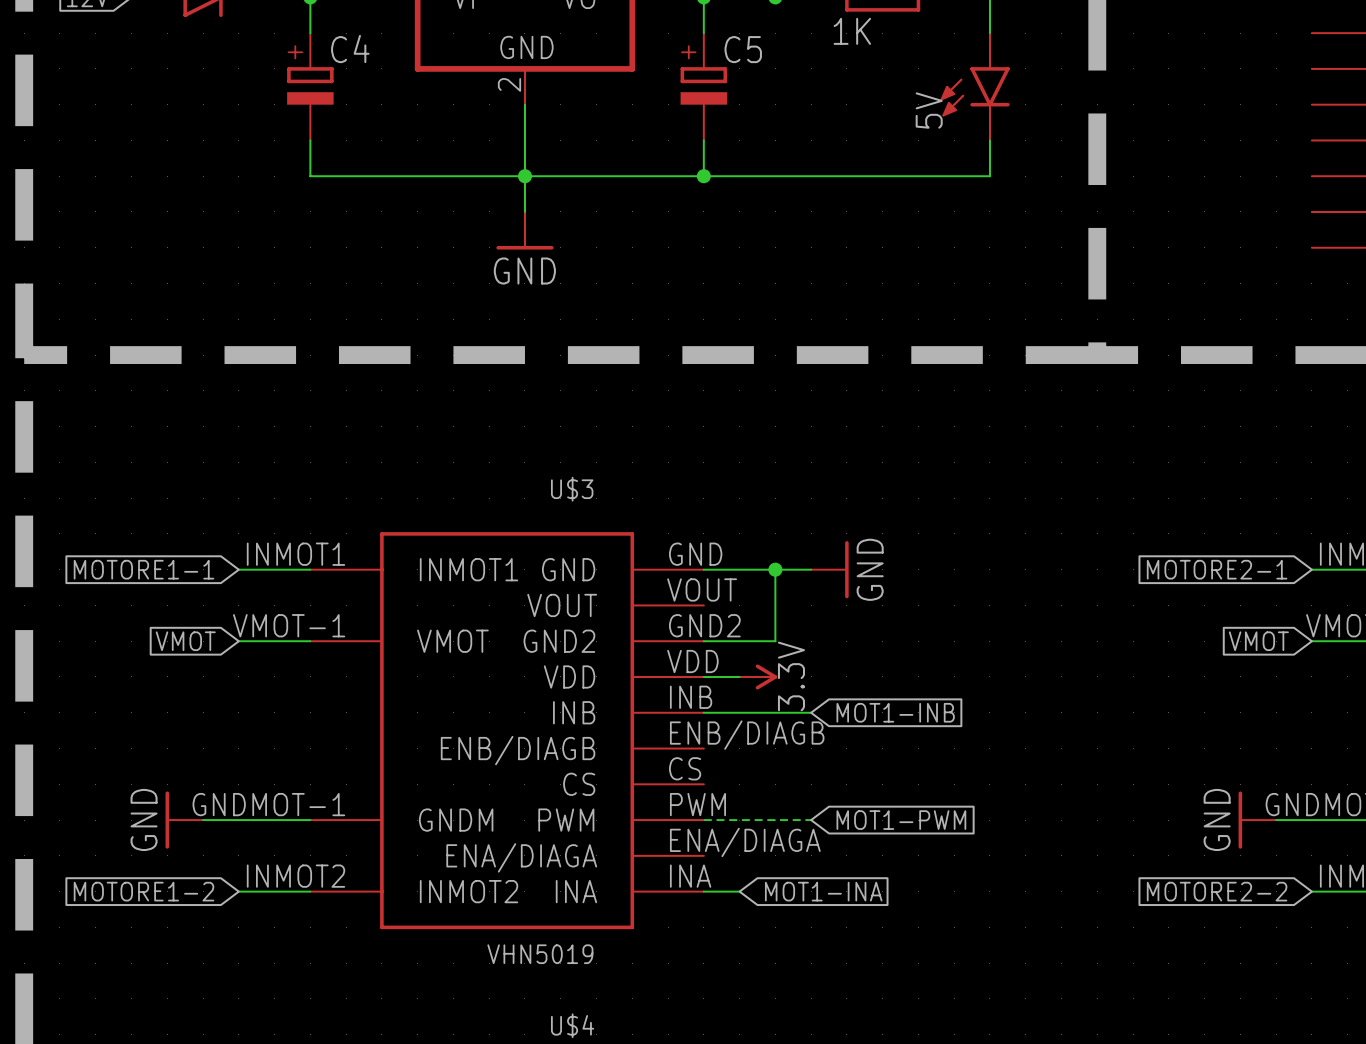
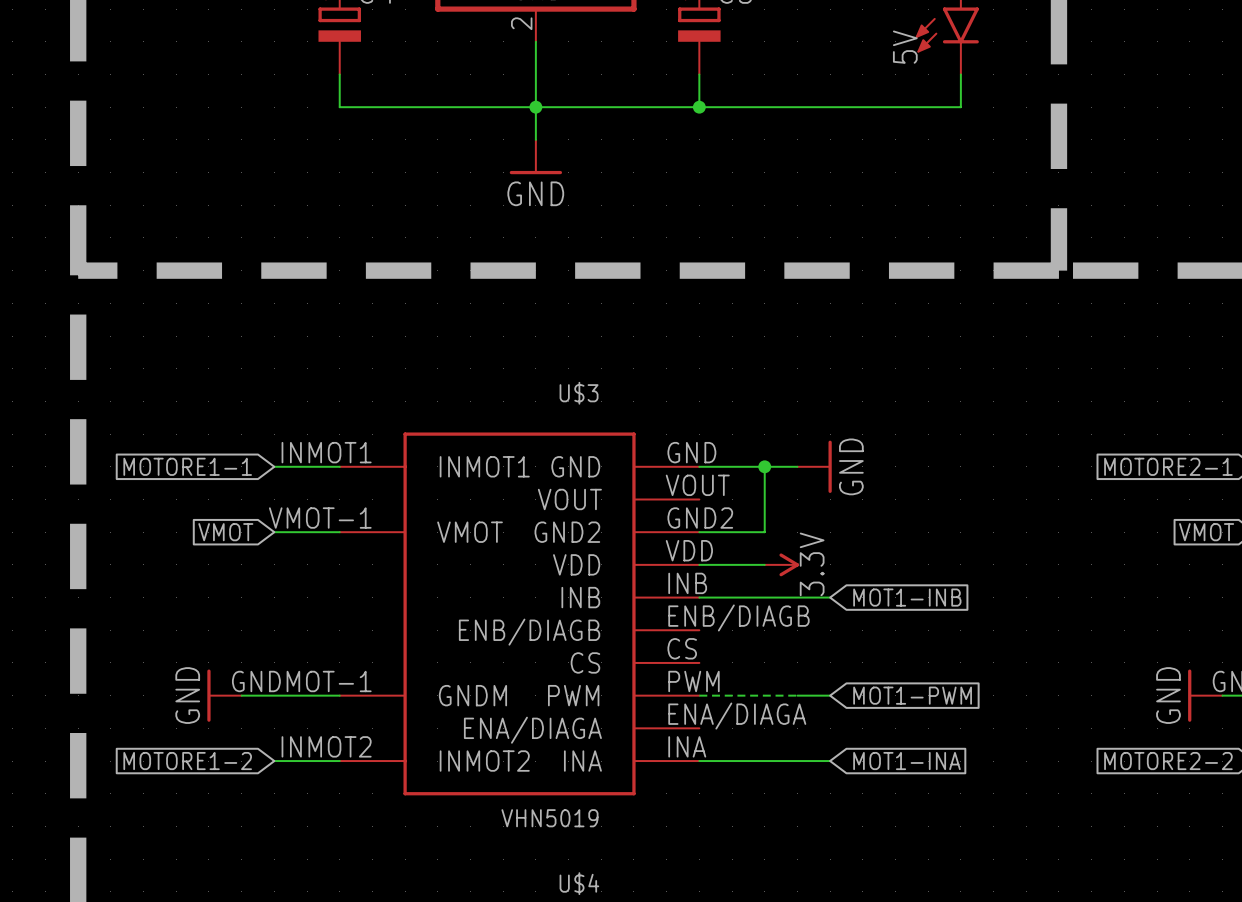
power symbol position: 3.3V (758, 676) -> 3.3V (781, 564)
wire: none -> (797, 597) (830, 597)
global label position: MOT1-INB (895, 712) -> MOT1-INB (907, 597)
wire: none -> (797, 695) (830, 695)
global label position: MOT1-PWM (901, 820) -> MOT1-PWM (912, 695)
wire: none -> (732, 761) (830, 761)
global label position: MOT1-INA (823, 891) -> MOT1-INA (906, 761)

